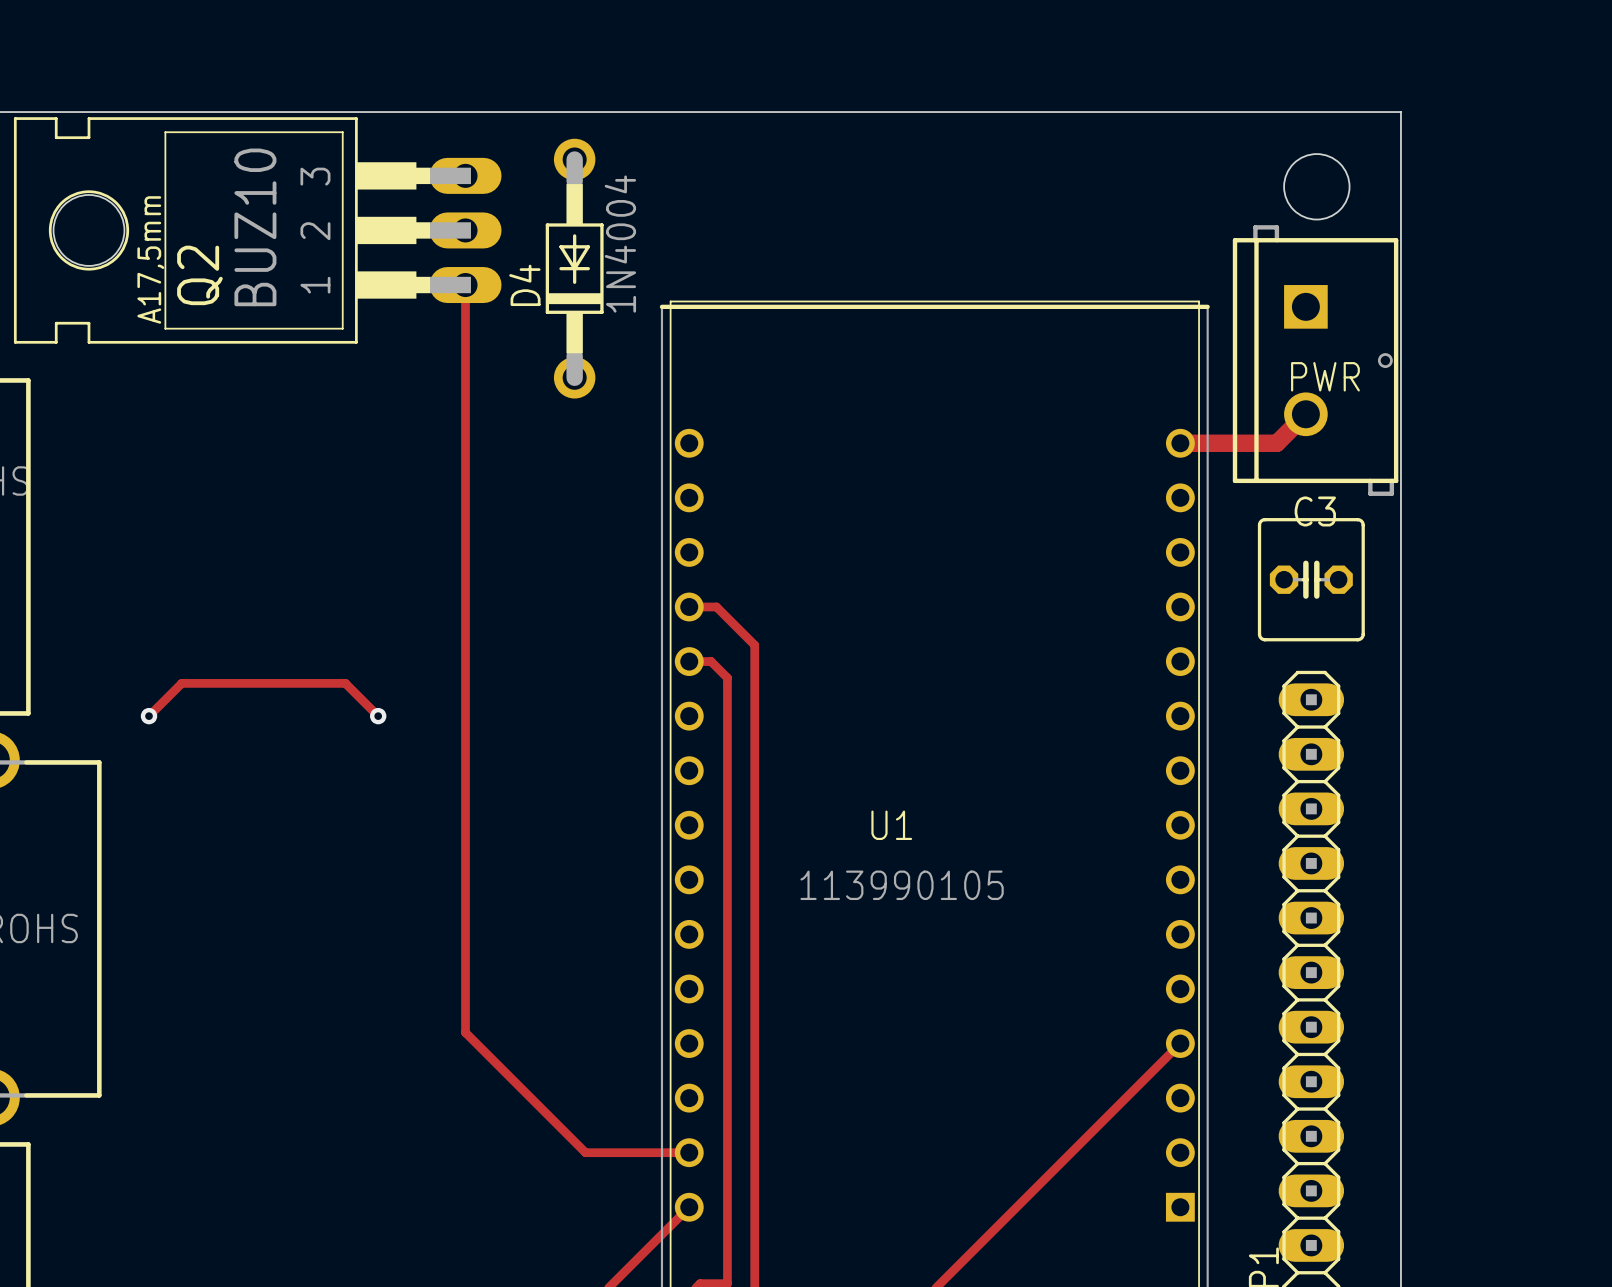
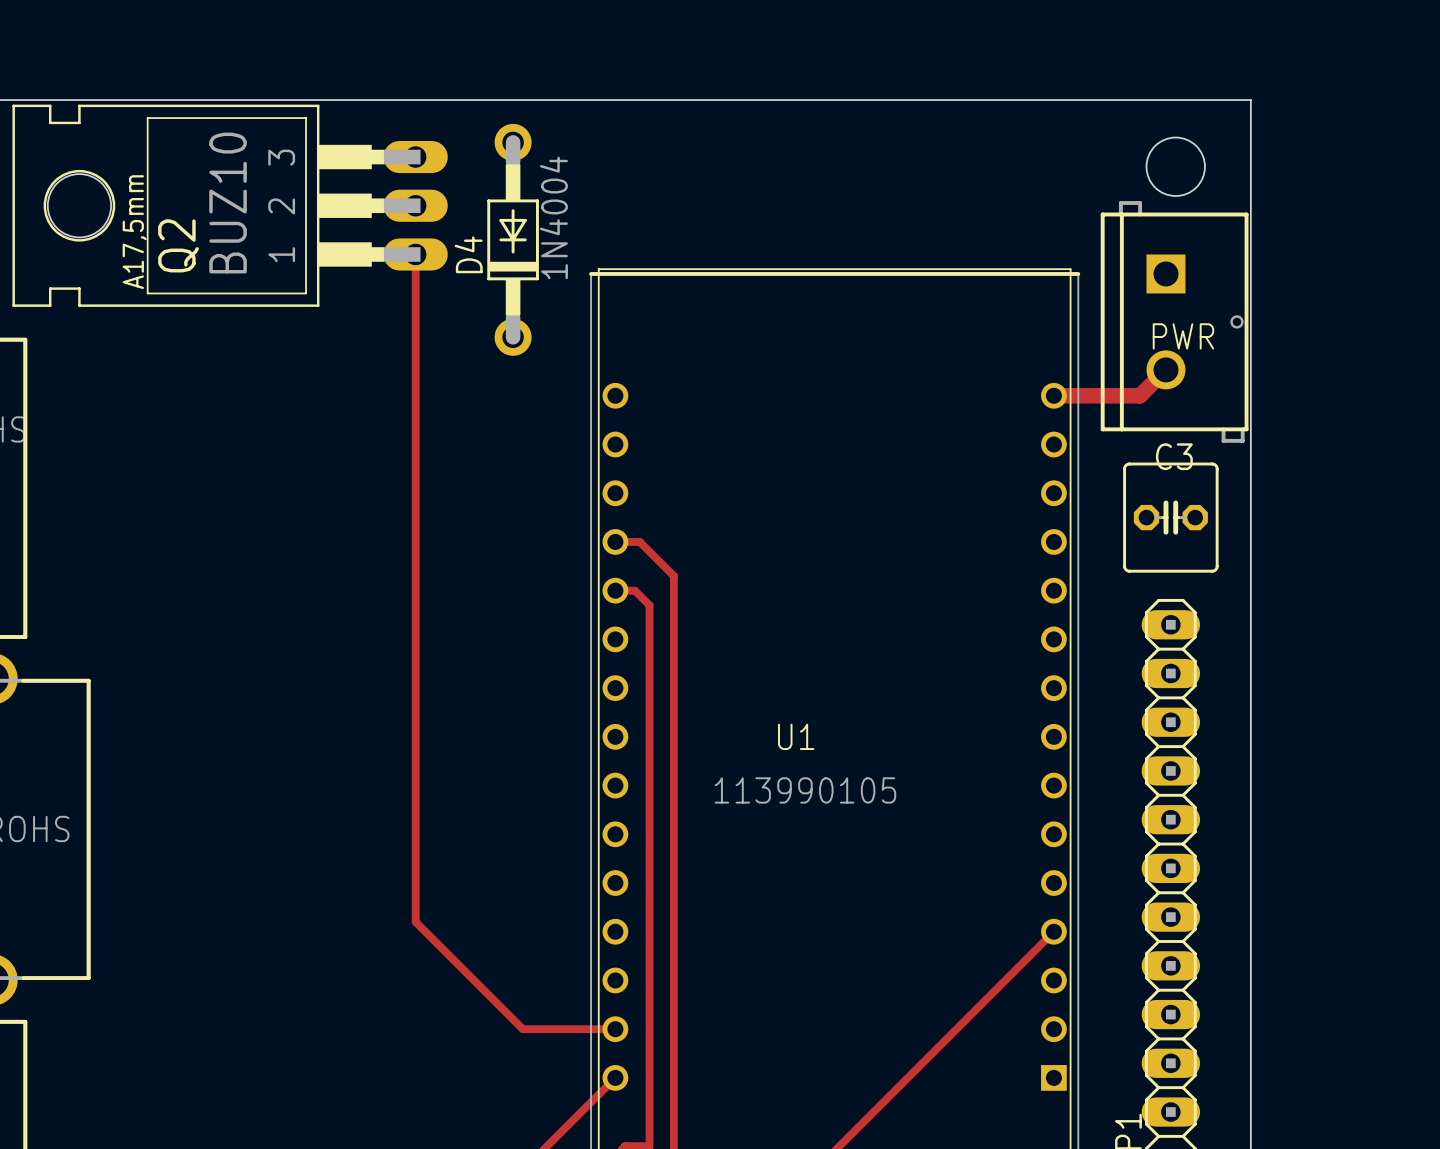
track: (149, 716) (181, 683) (345, 683) (378, 716) -> none
via: (149, 716) -> none
via: (378, 716) -> none

